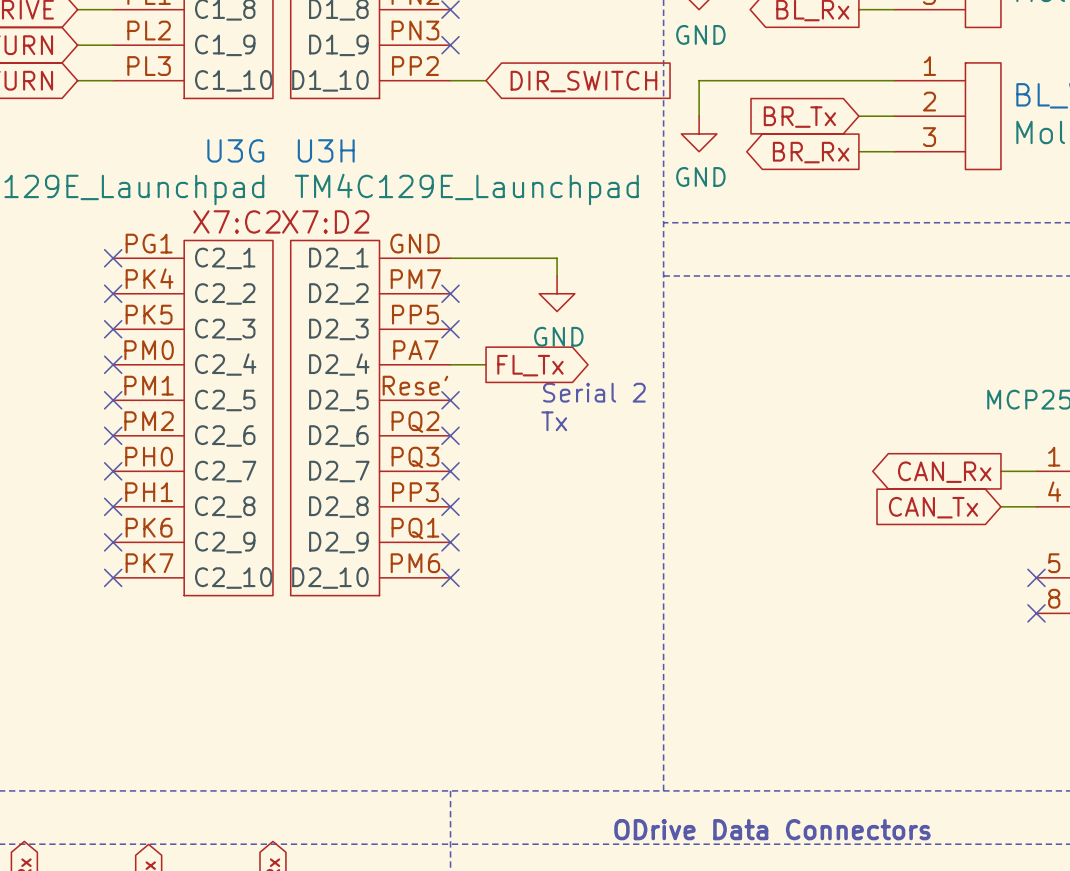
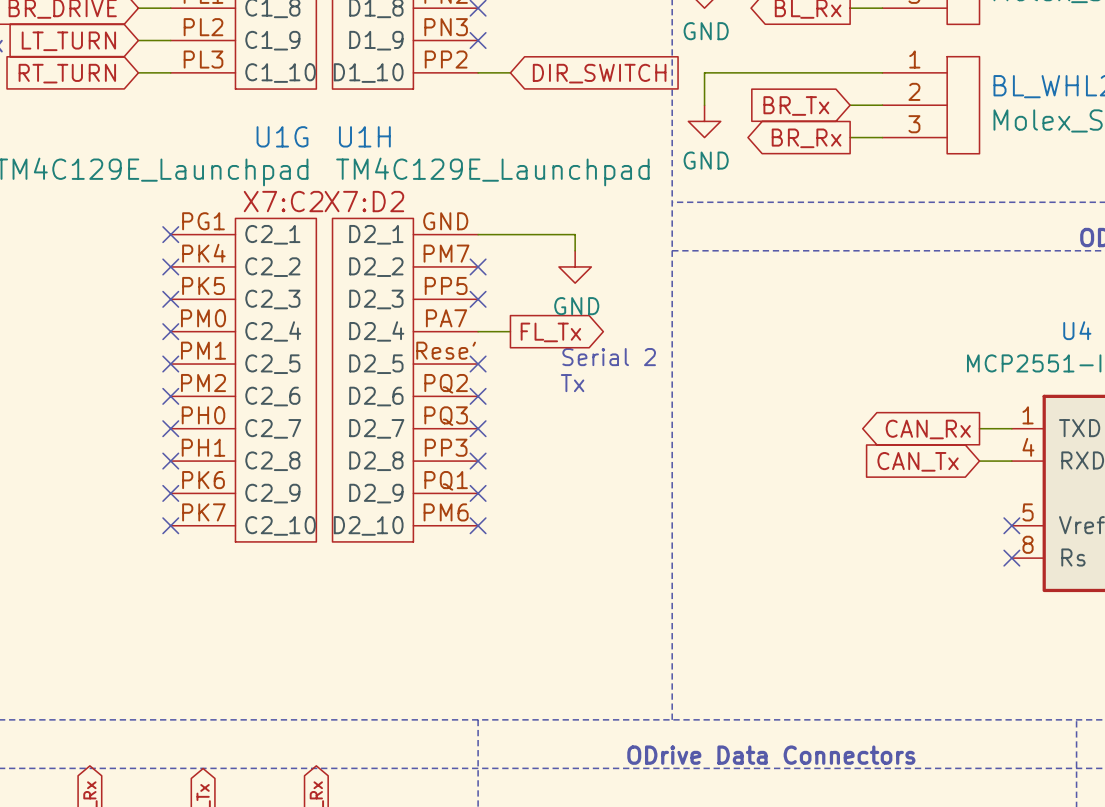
U3G name: U3G (235, 150) -> U1G (282, 136)
U3H name: U3H (326, 150) -> U1H (364, 136)

